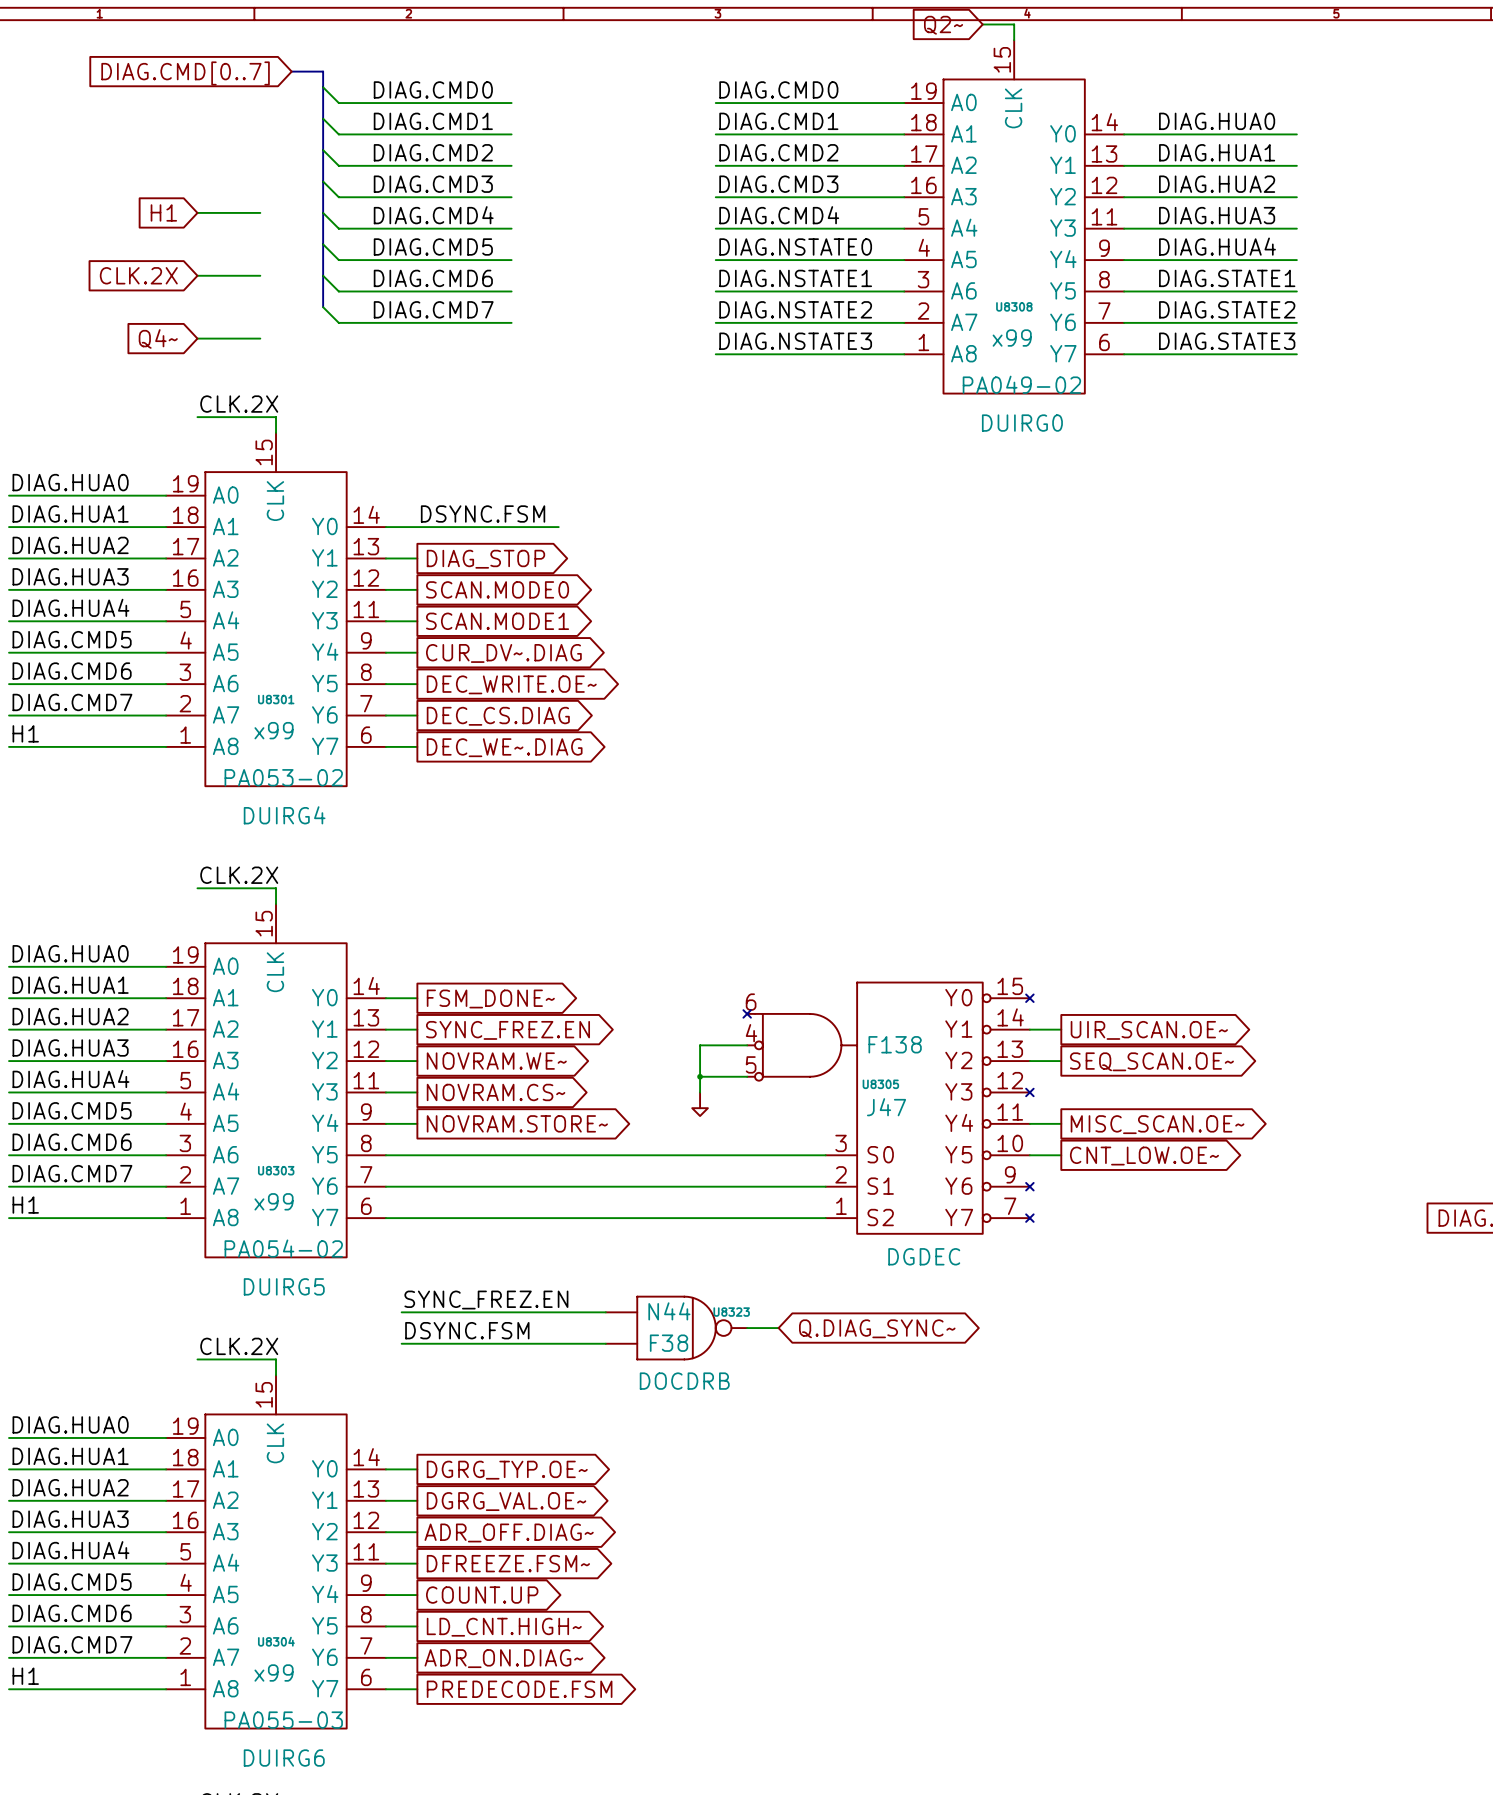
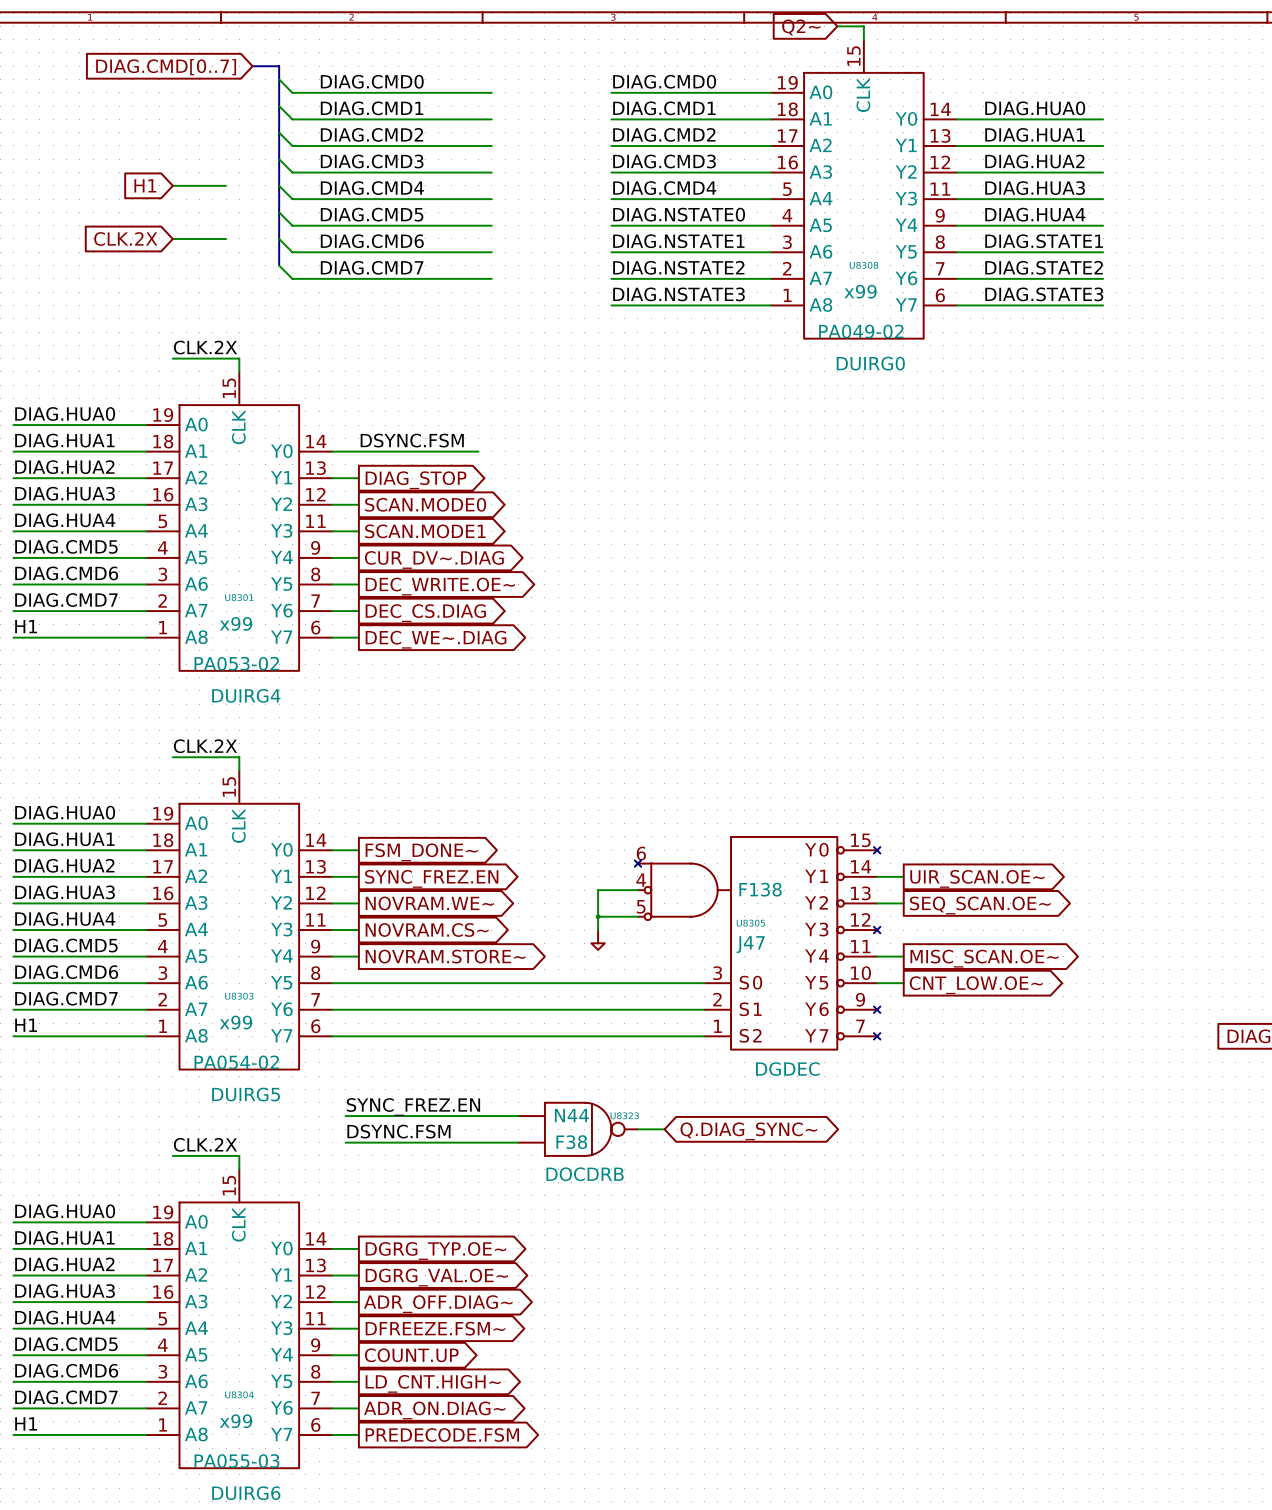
wire: none -> (438, 92) (491, 92)
wire: none -> (438, 119) (491, 119)
wire: none -> (438, 145) (491, 145)
wire: none -> (438, 172) (491, 172)
wire: none -> (438, 199) (491, 199)
wire: none -> (438, 225) (491, 225)
wire: none -> (438, 252) (491, 252)
wire: none -> (438, 278) (491, 278)
global label: Q4~ (158, 338) -> none
wire: (197, 338) (260, 338) -> none

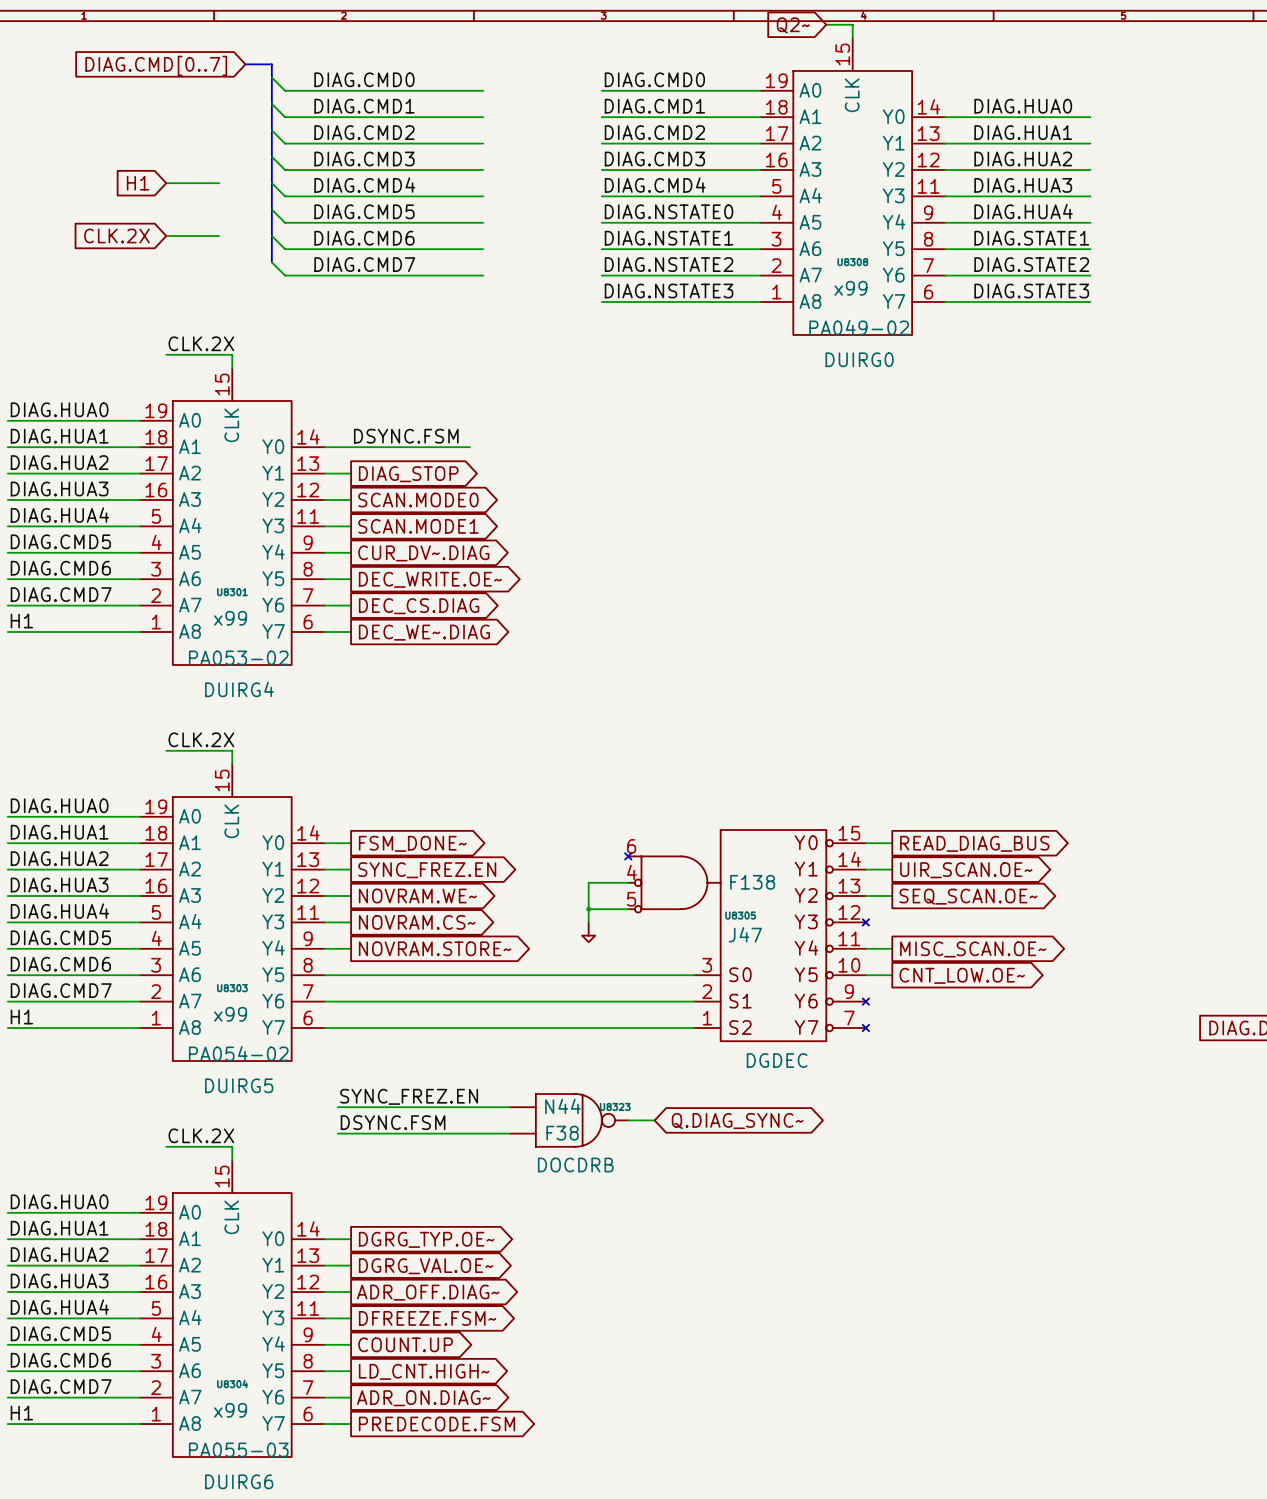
wire: none -> (865, 843) (892, 843)
no-connect mark: (877, 850) -> none
global label: none -> READ_DIAG_BUS (974, 843)

